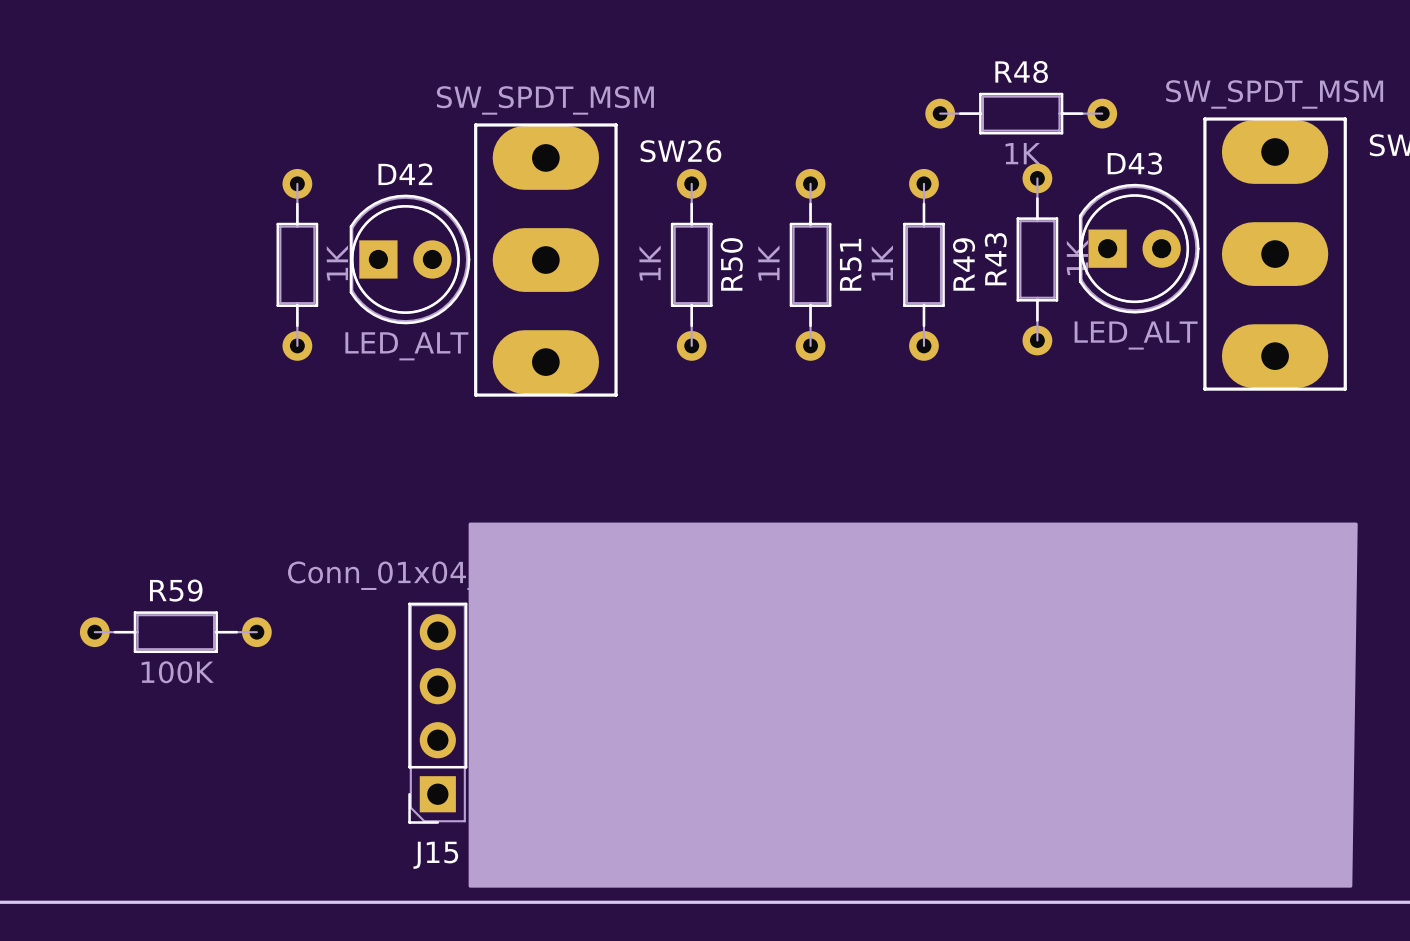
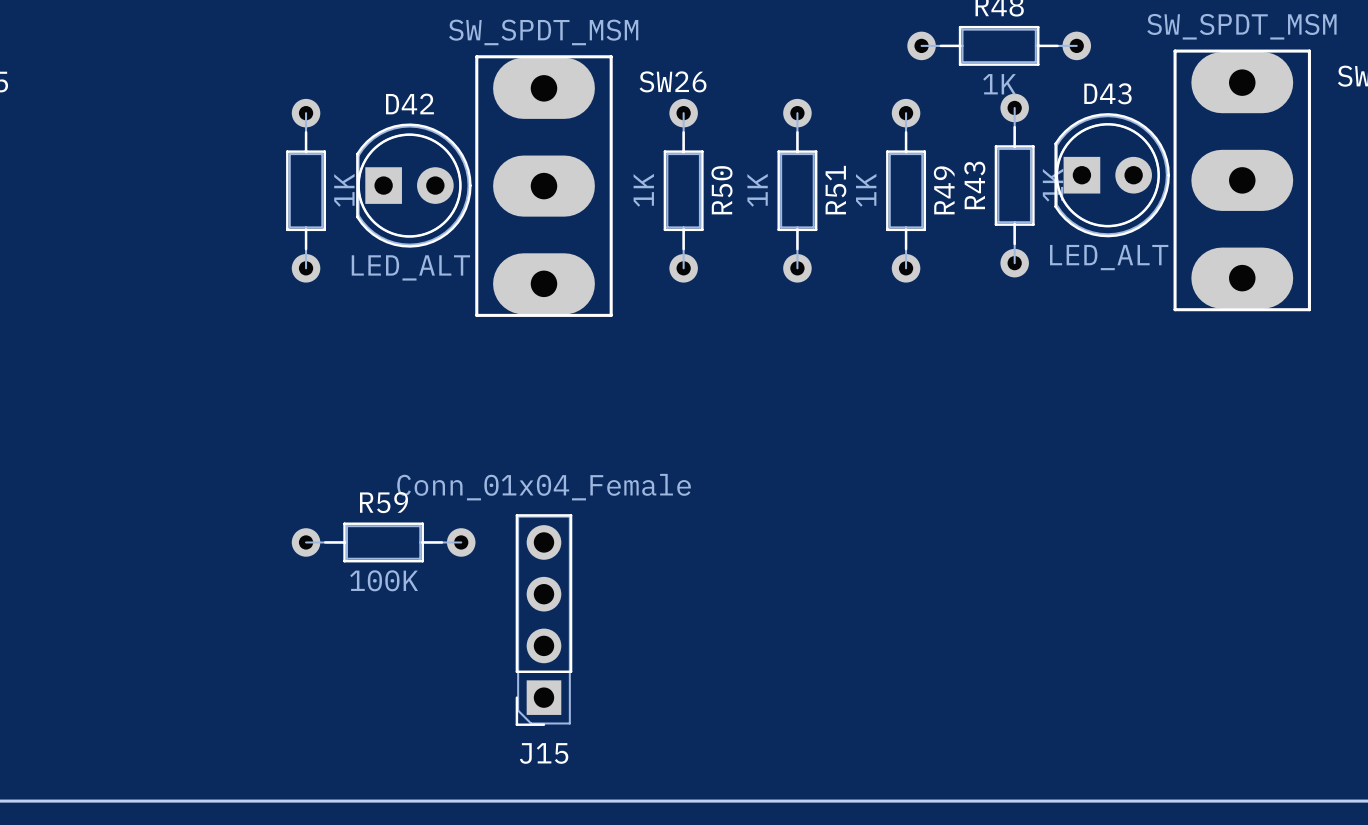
drawing: [468, 522, 1358, 888] -> none
R59 position: (175, 632) -> (383, 542)
J15 position: (437, 713) -> (543, 620)

